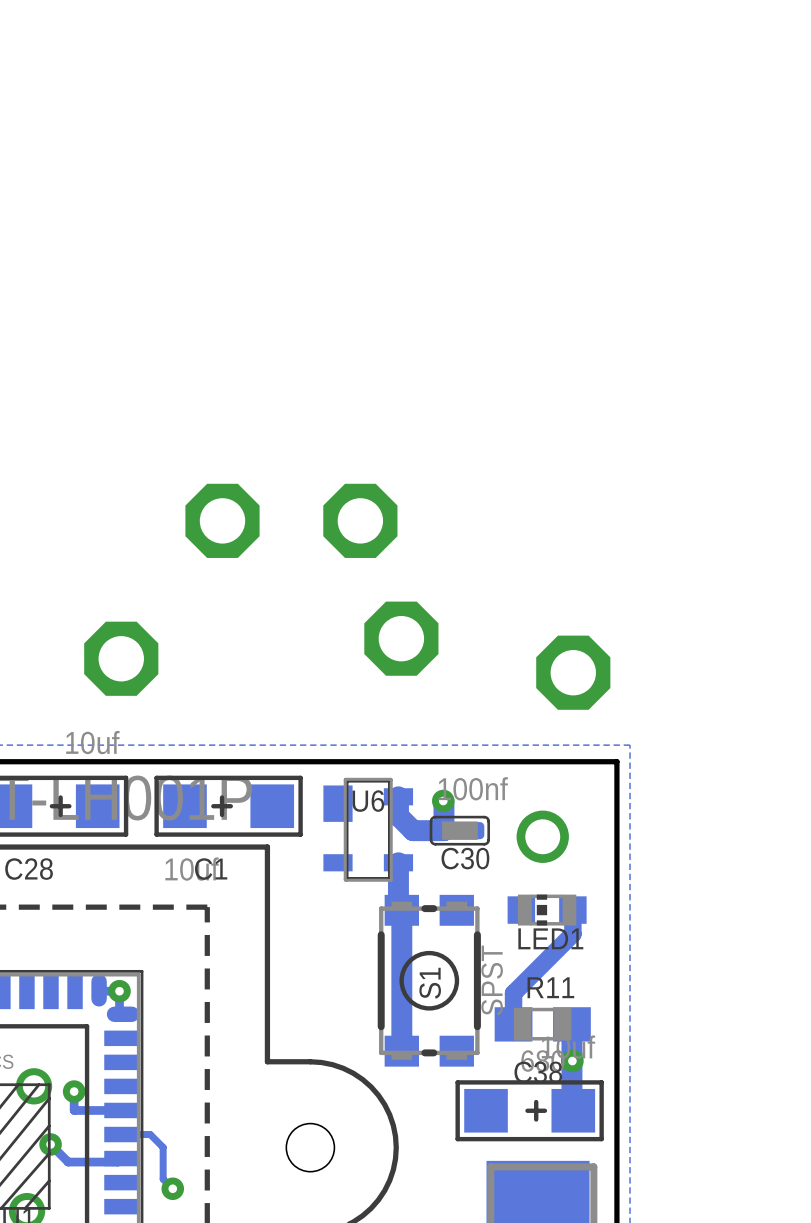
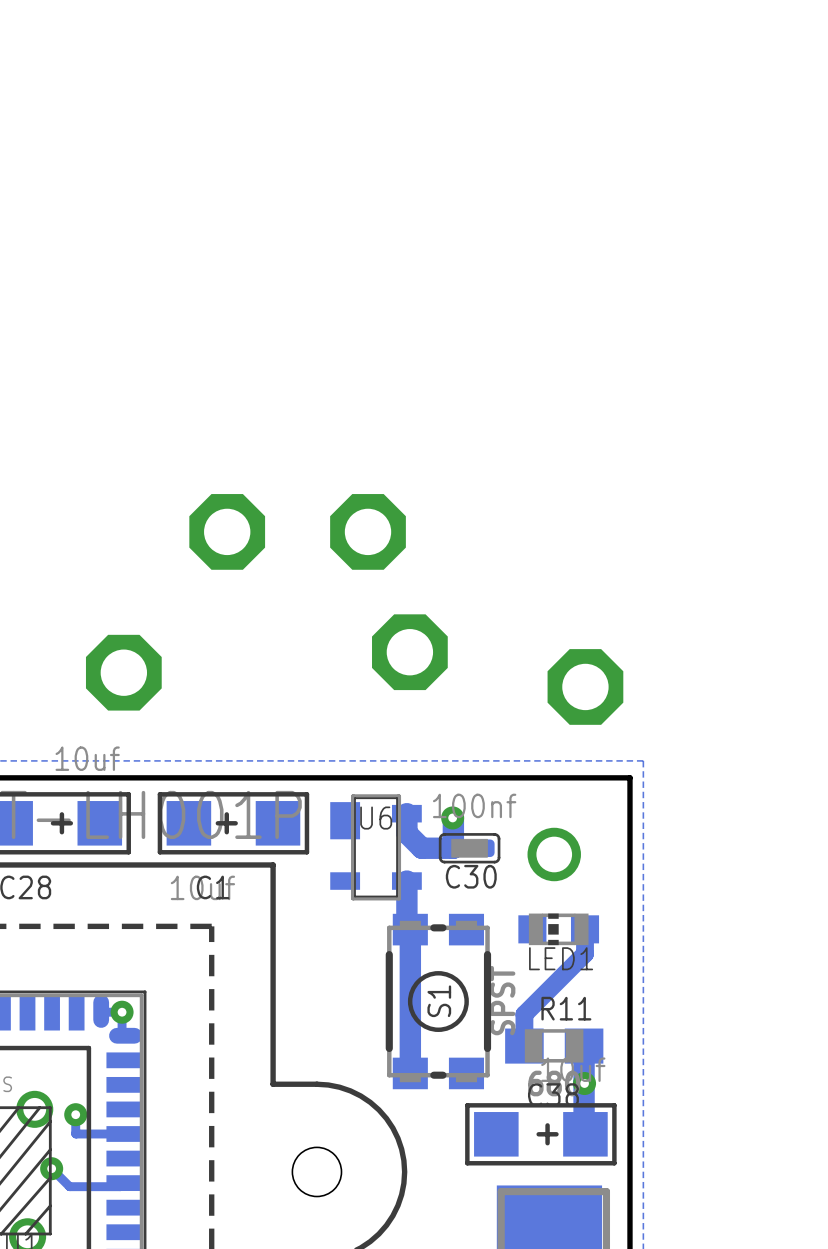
track: (121, 1134) (150, 1134) (163, 1147) (163, 1179) (172, 1188) -> none
via: (172, 1188) -> none

